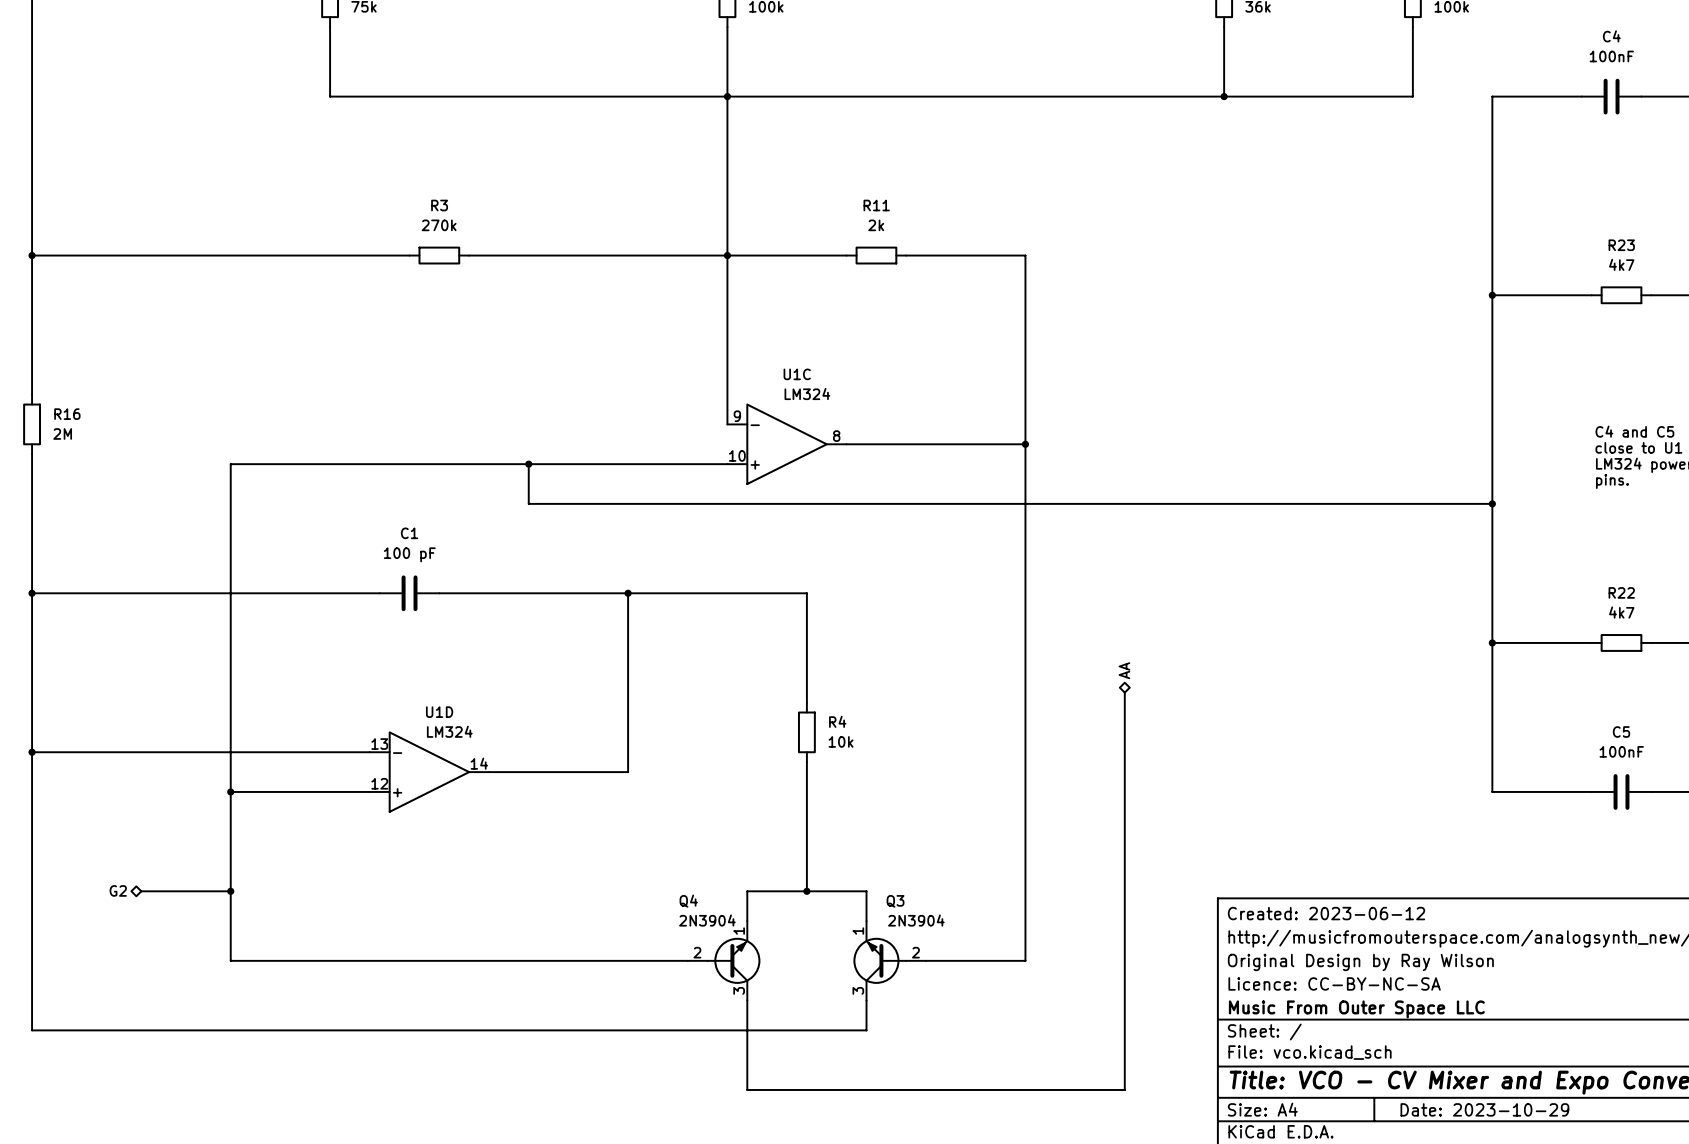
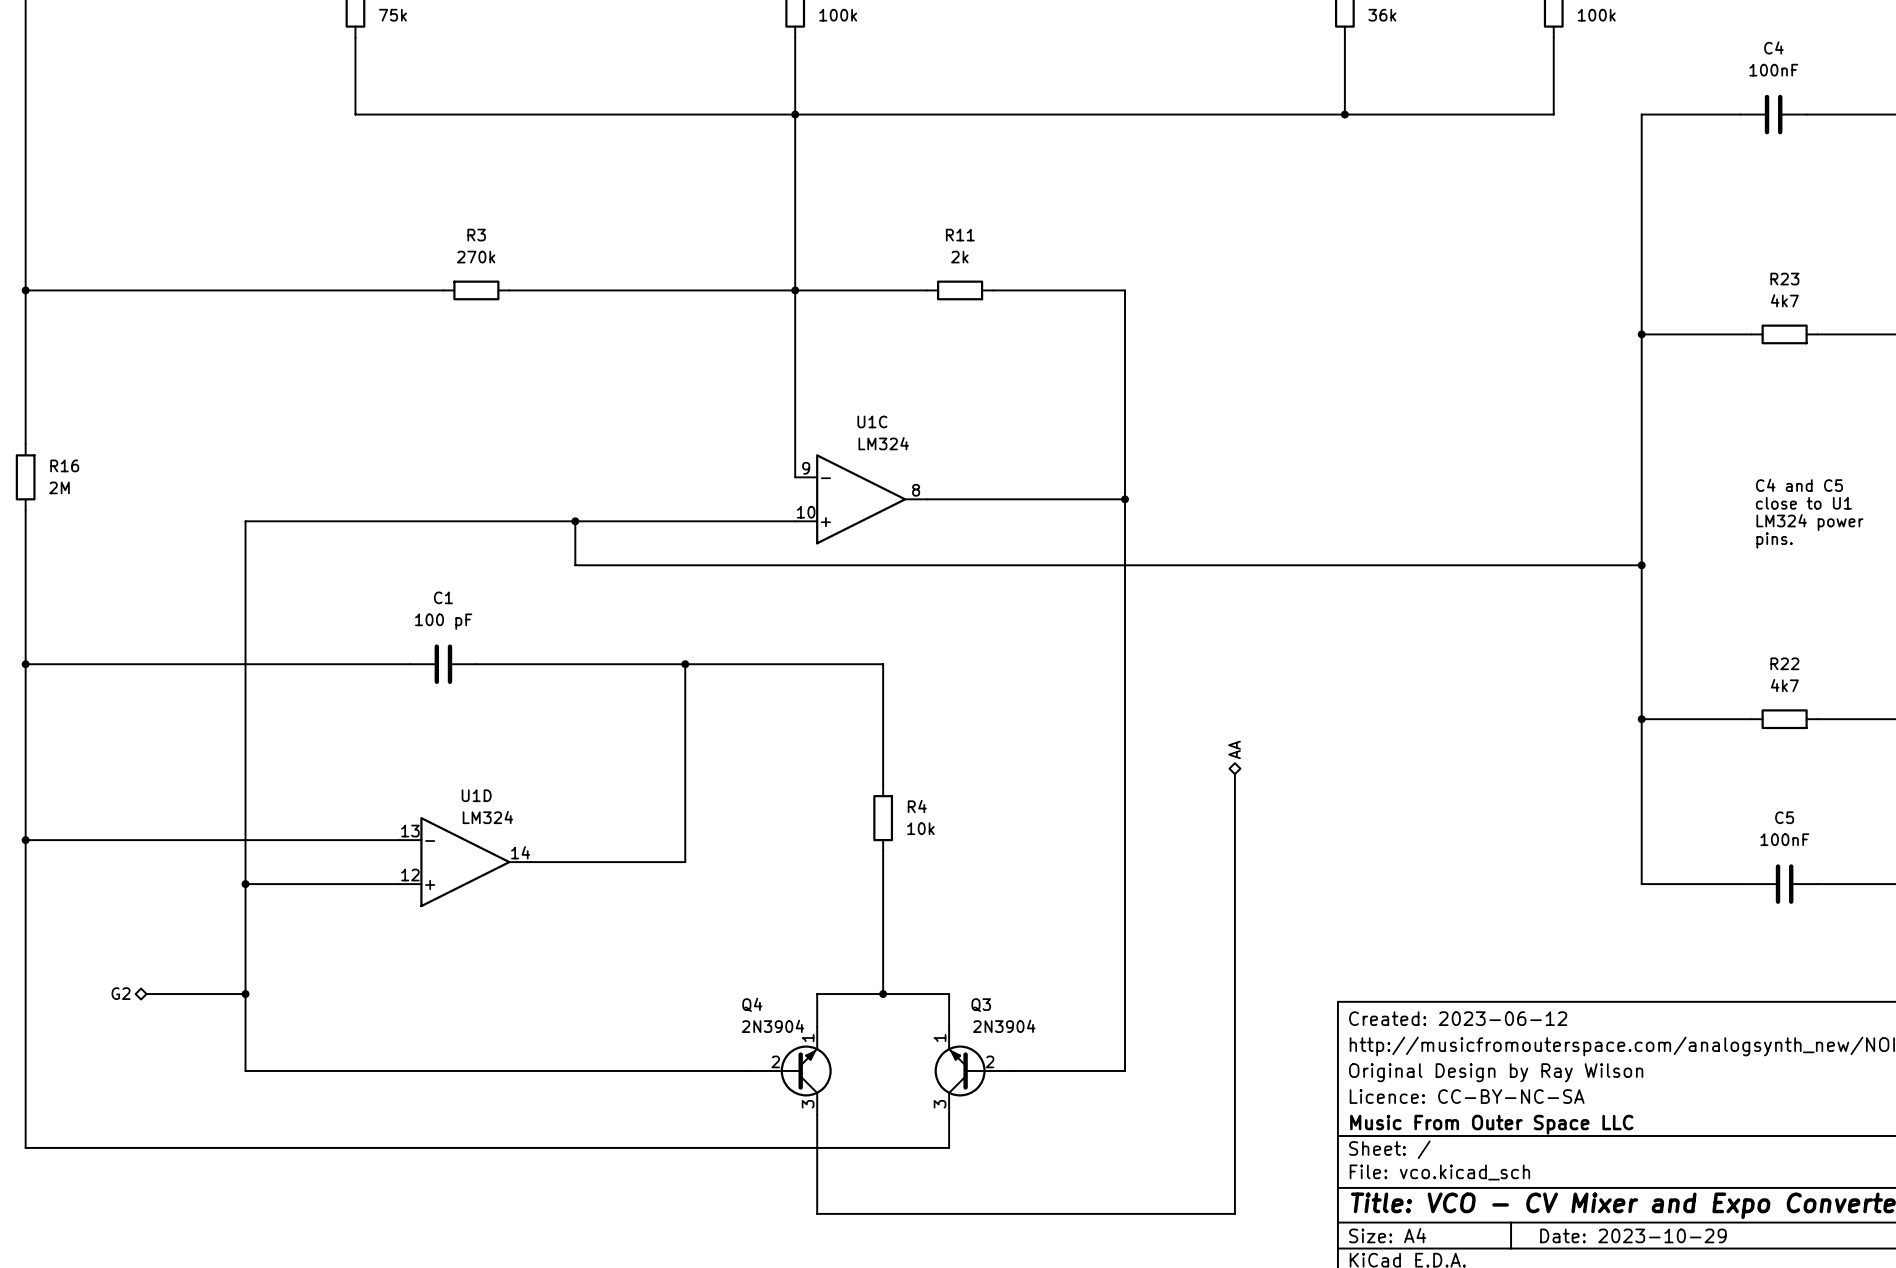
Q4 symbol: [687, 921, 761, 1001] -> [751, 1027, 832, 1115]
Q3 symbol: [853, 921, 927, 1001] -> [934, 1027, 1016, 1115]

